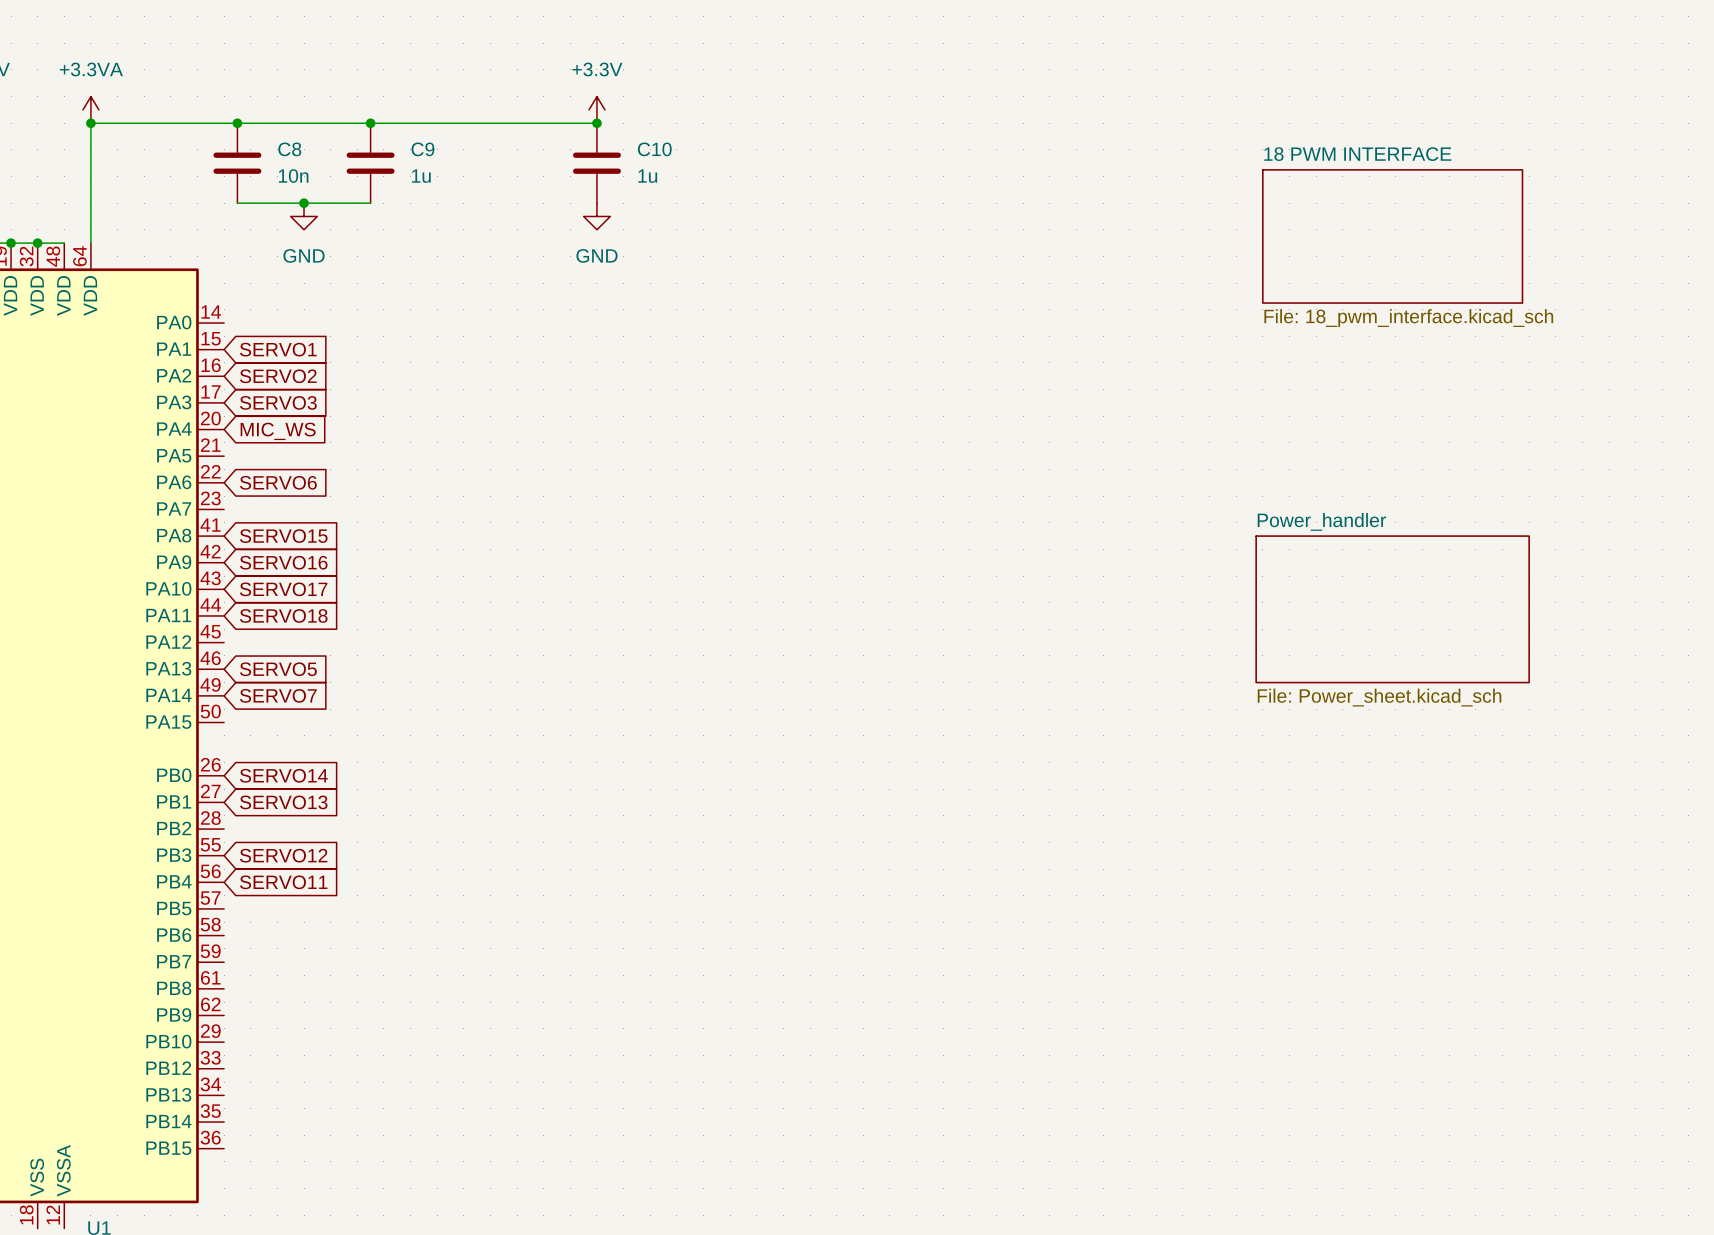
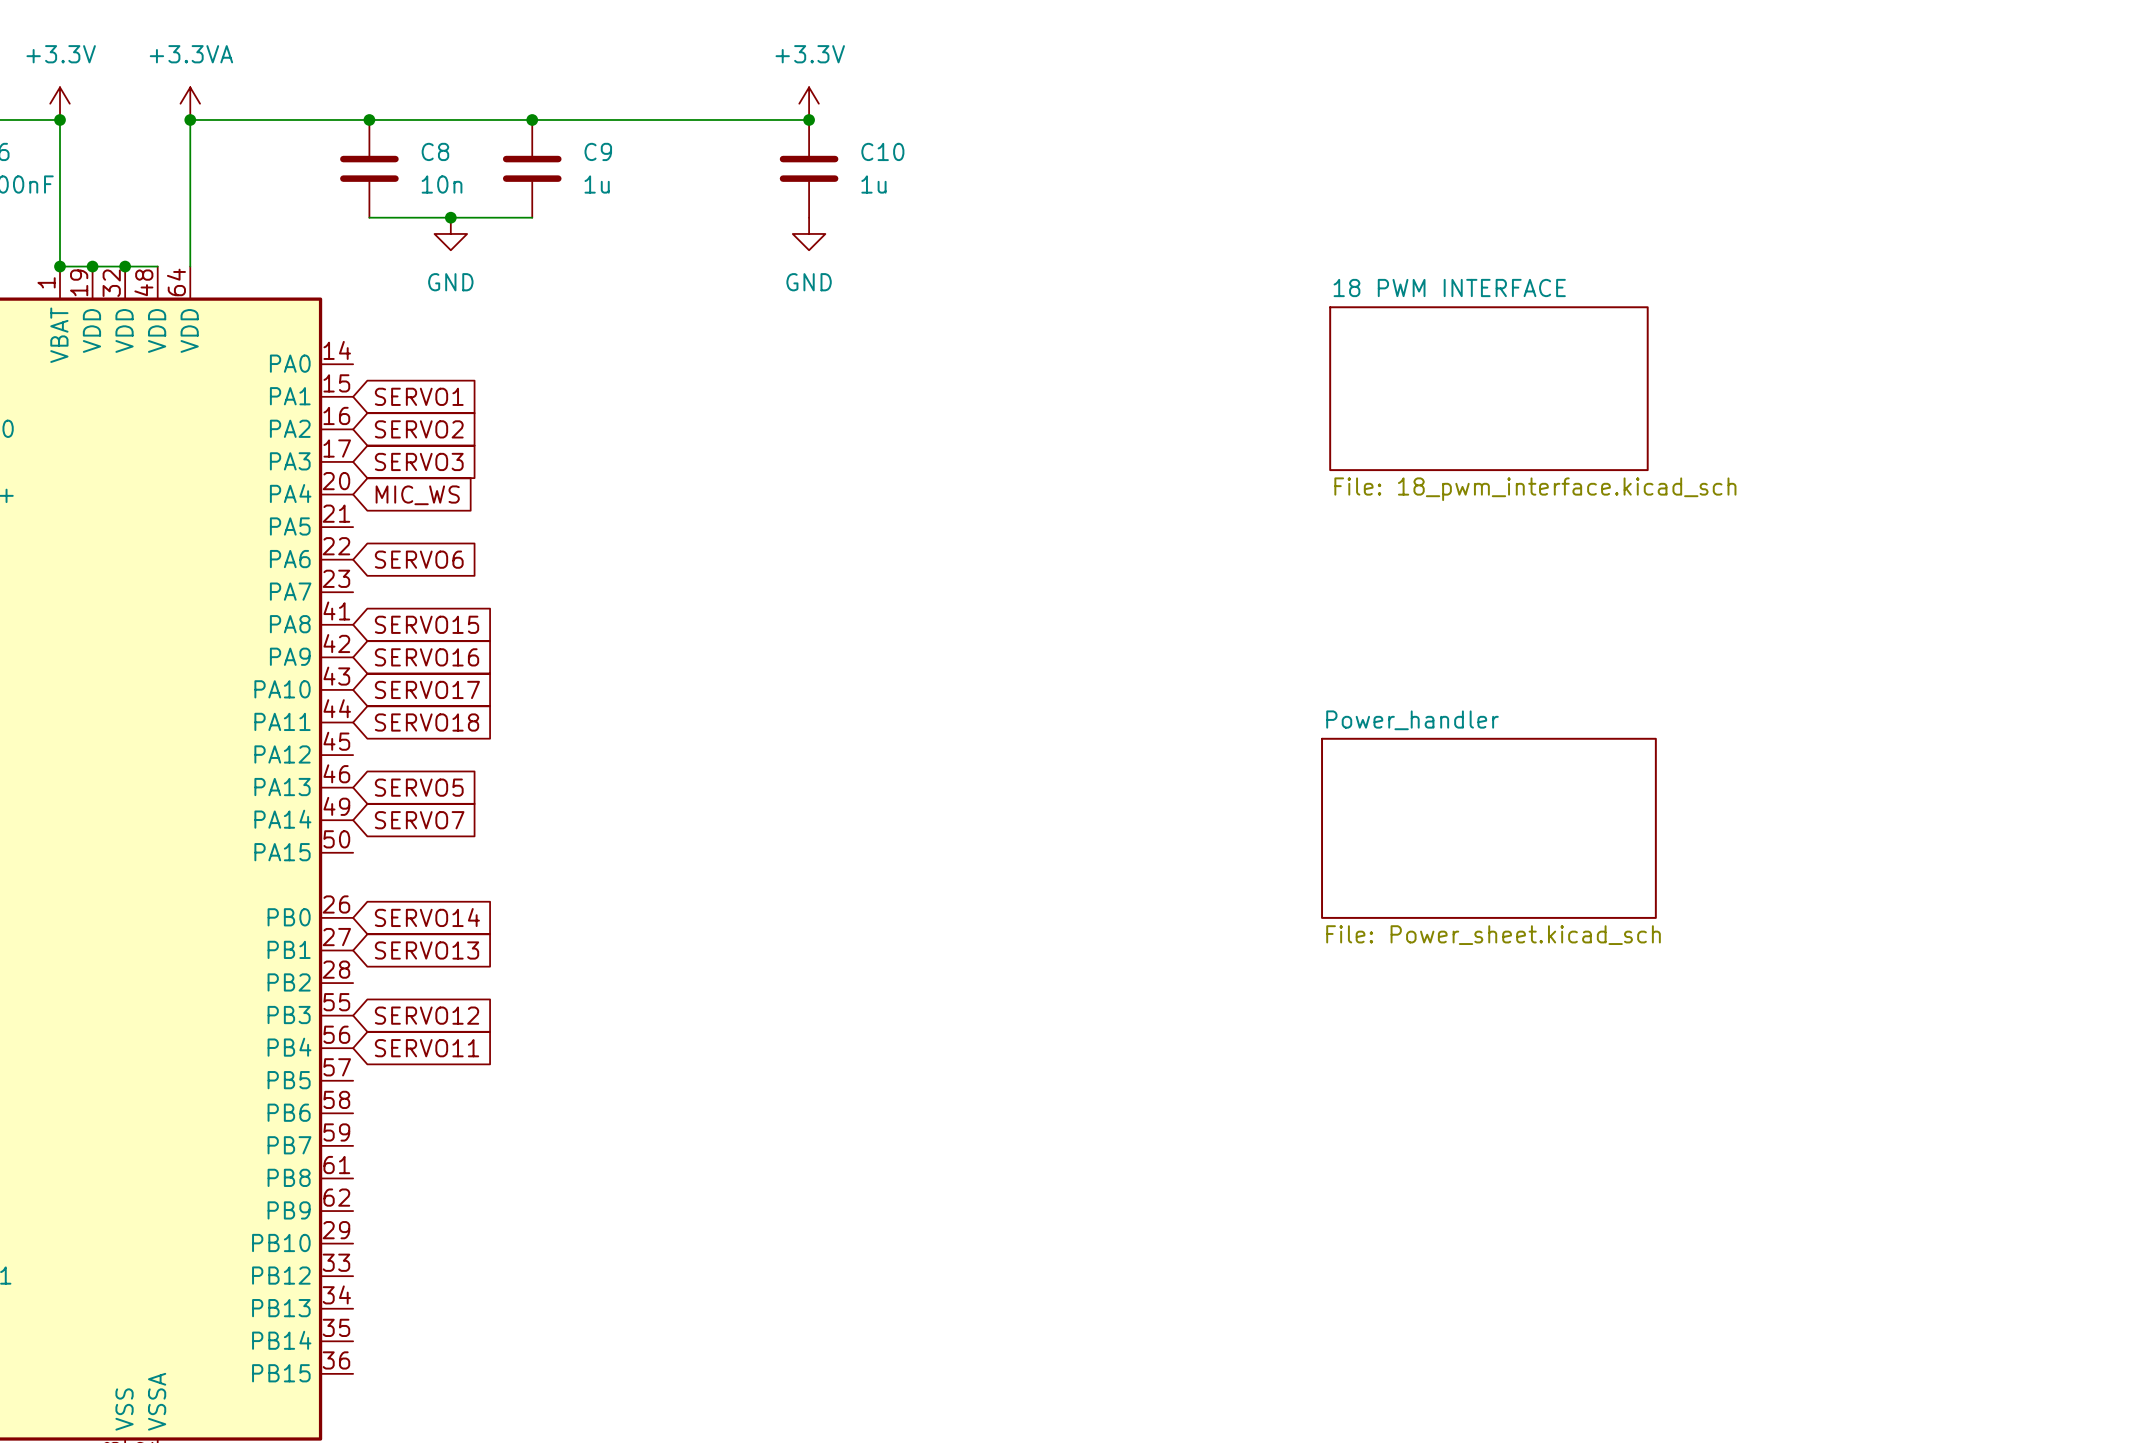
sheet 18 PWM INTERFACE position: (1392, 236) -> (1488, 388)
sheet Power_handler position: (1392, 609) -> (1488, 828)

